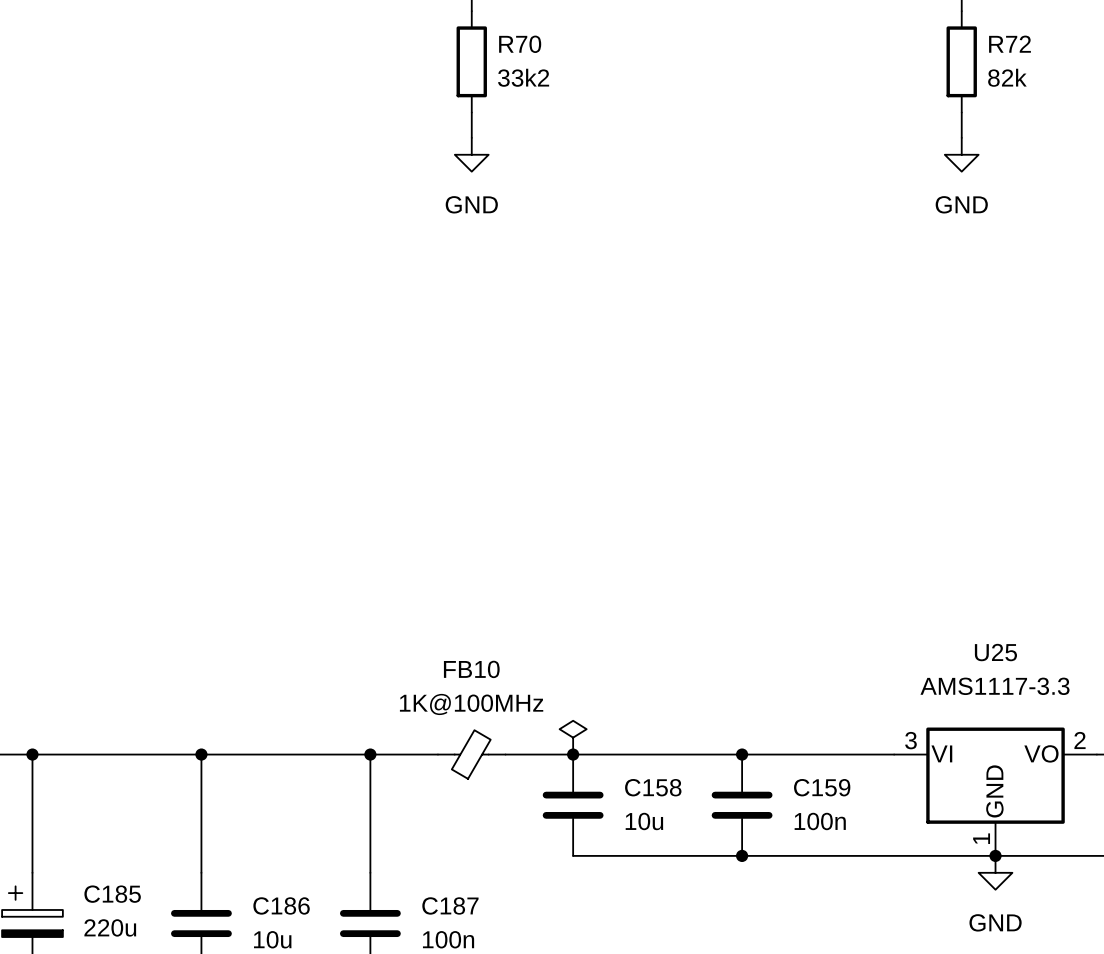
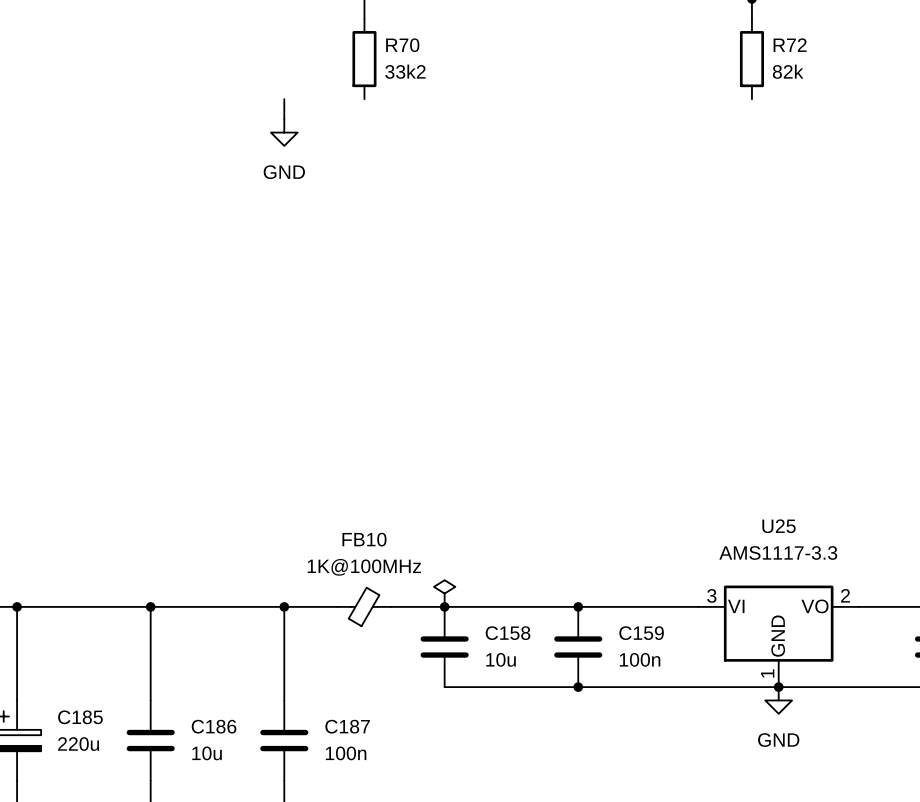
wire: (471, 112) (471, 137) -> (284, 99) (284, 119)
wire: (961, 112) (961, 137) -> none
power symbol position: GND (471, 154) -> GND (284, 132)
power symbol: GND (961, 154) -> none

